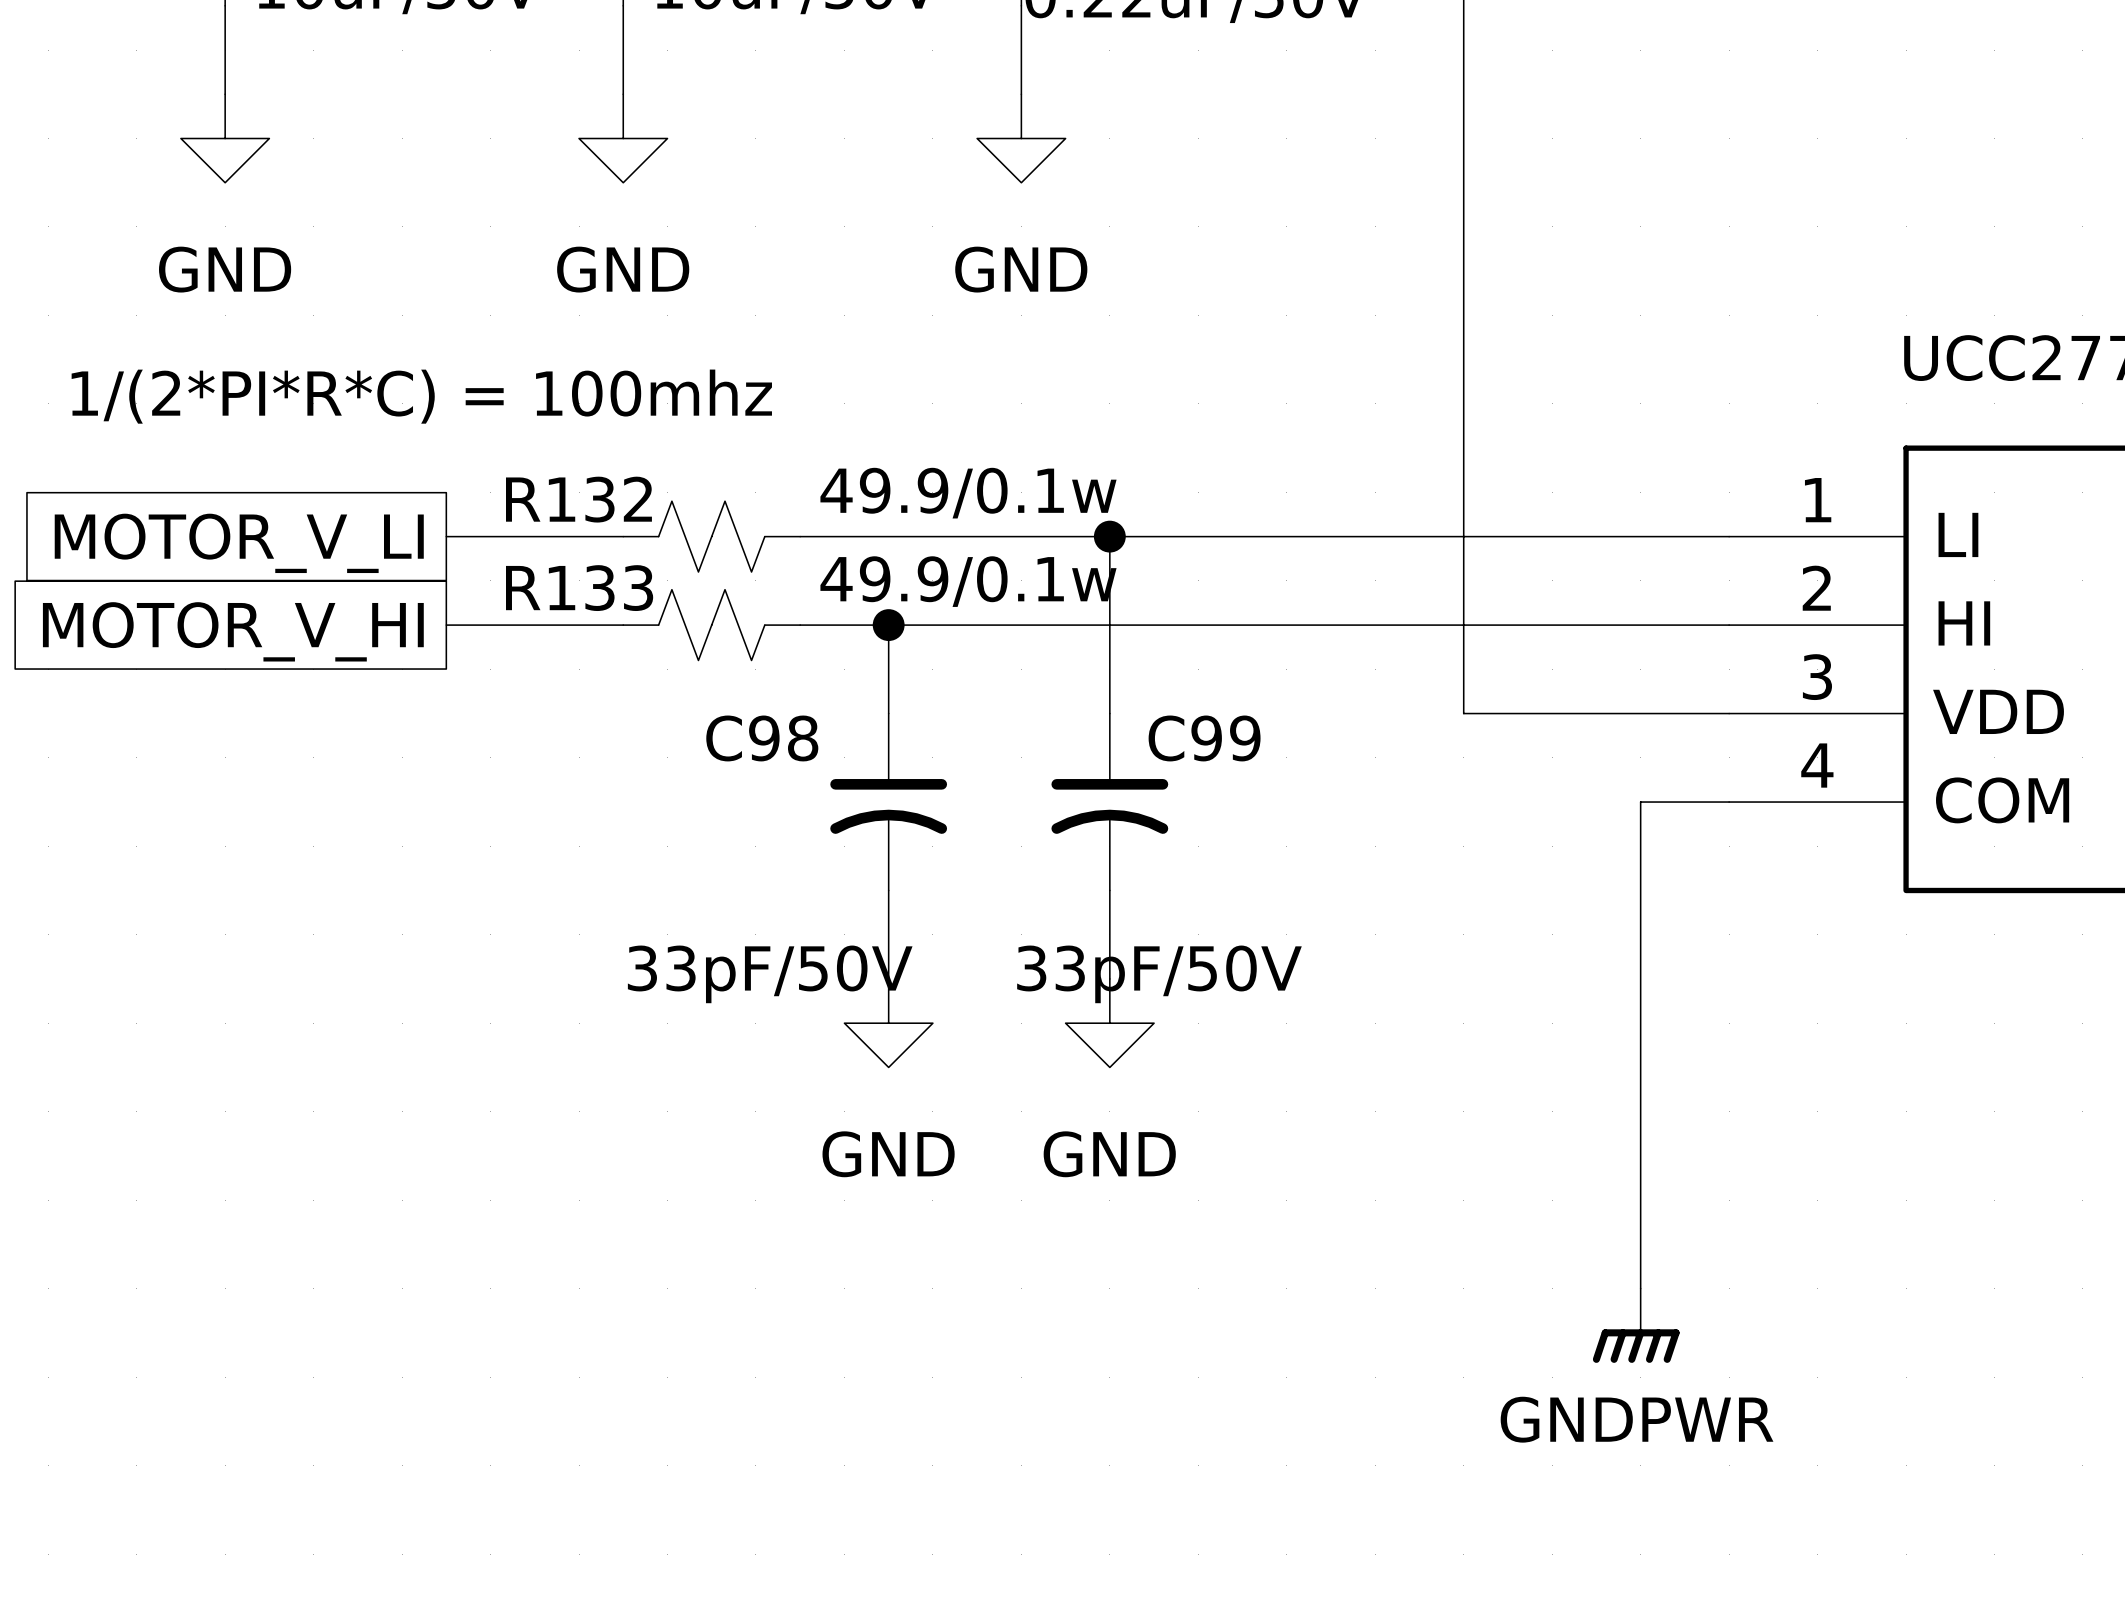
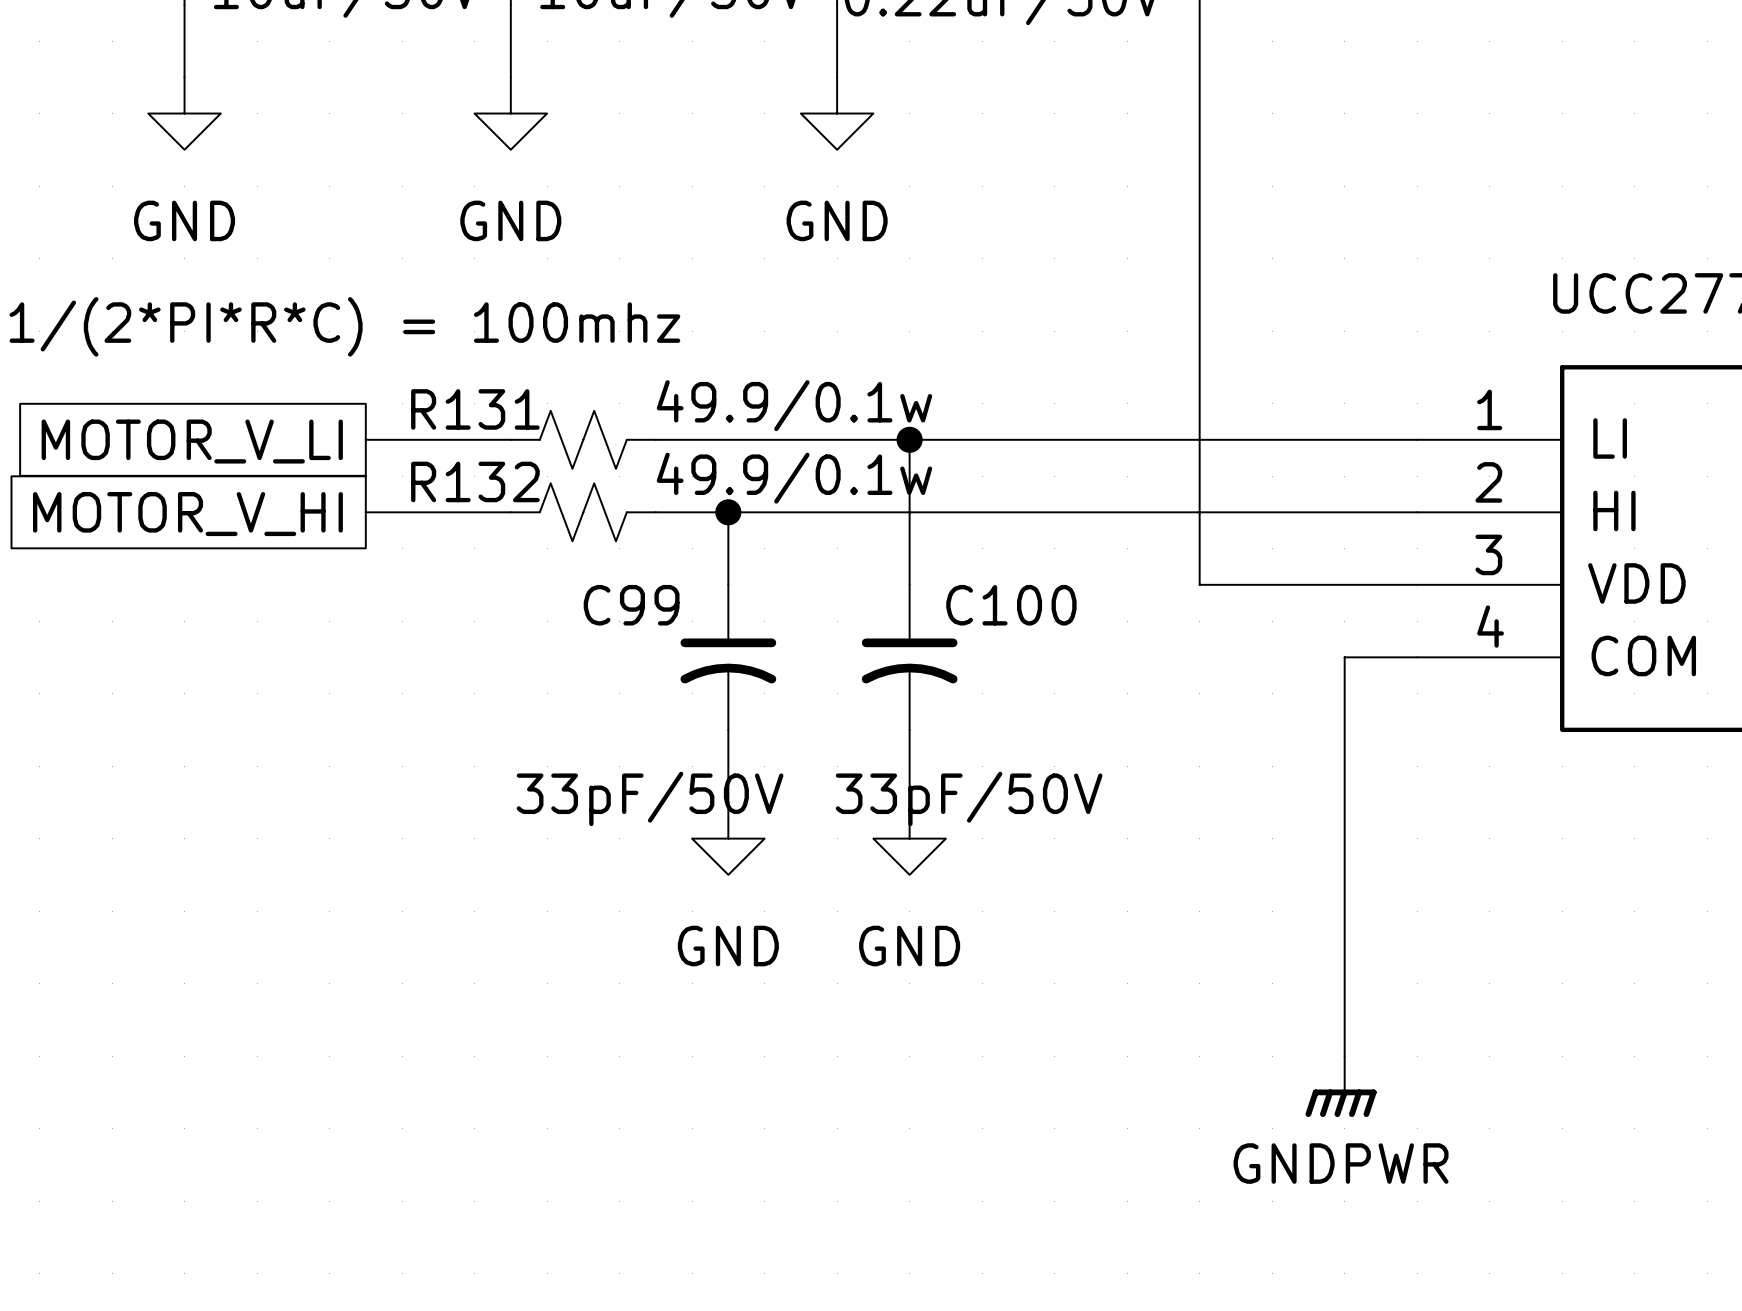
R132 name: R132 (578, 499) -> R131 (475, 409)
R133 name: R133 (579, 588) -> R132 (475, 481)
C98 name: C98 (762, 738) -> C99 (631, 605)
C99 name: C99 (1204, 738) -> C100 (1011, 605)

